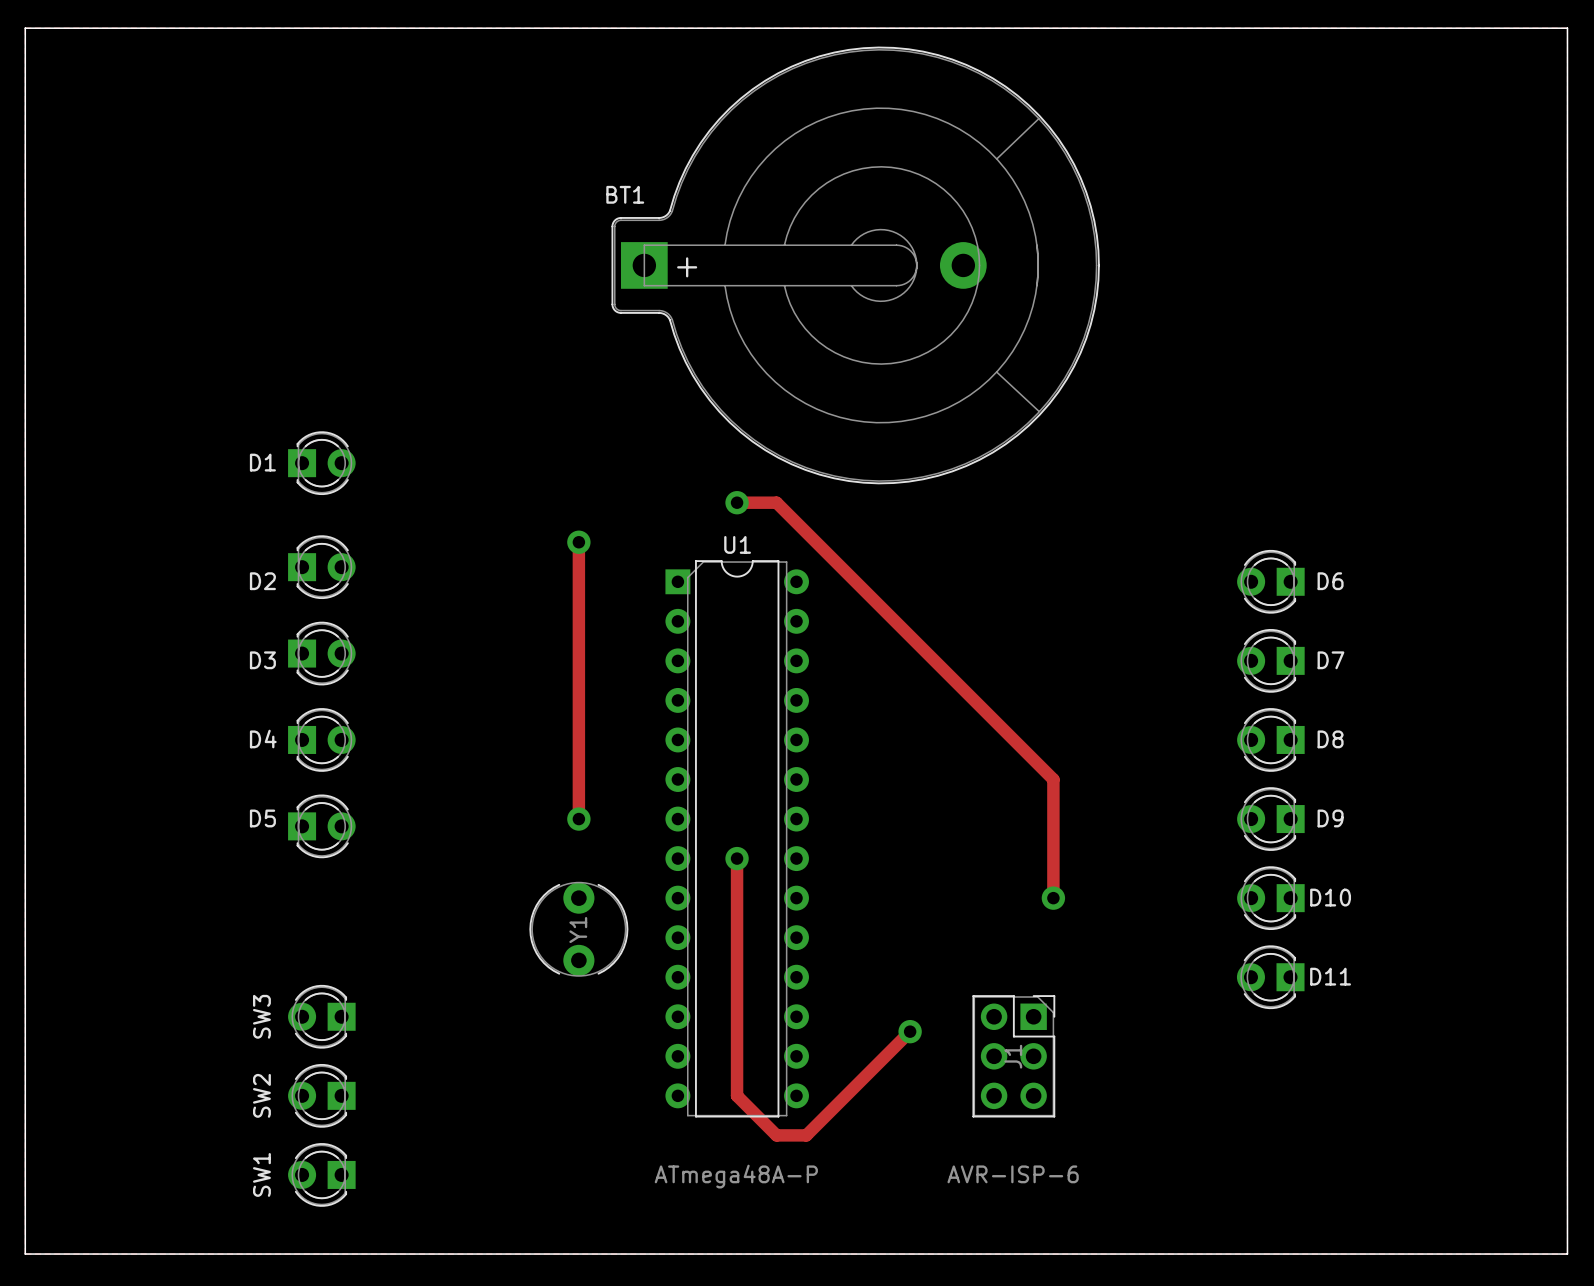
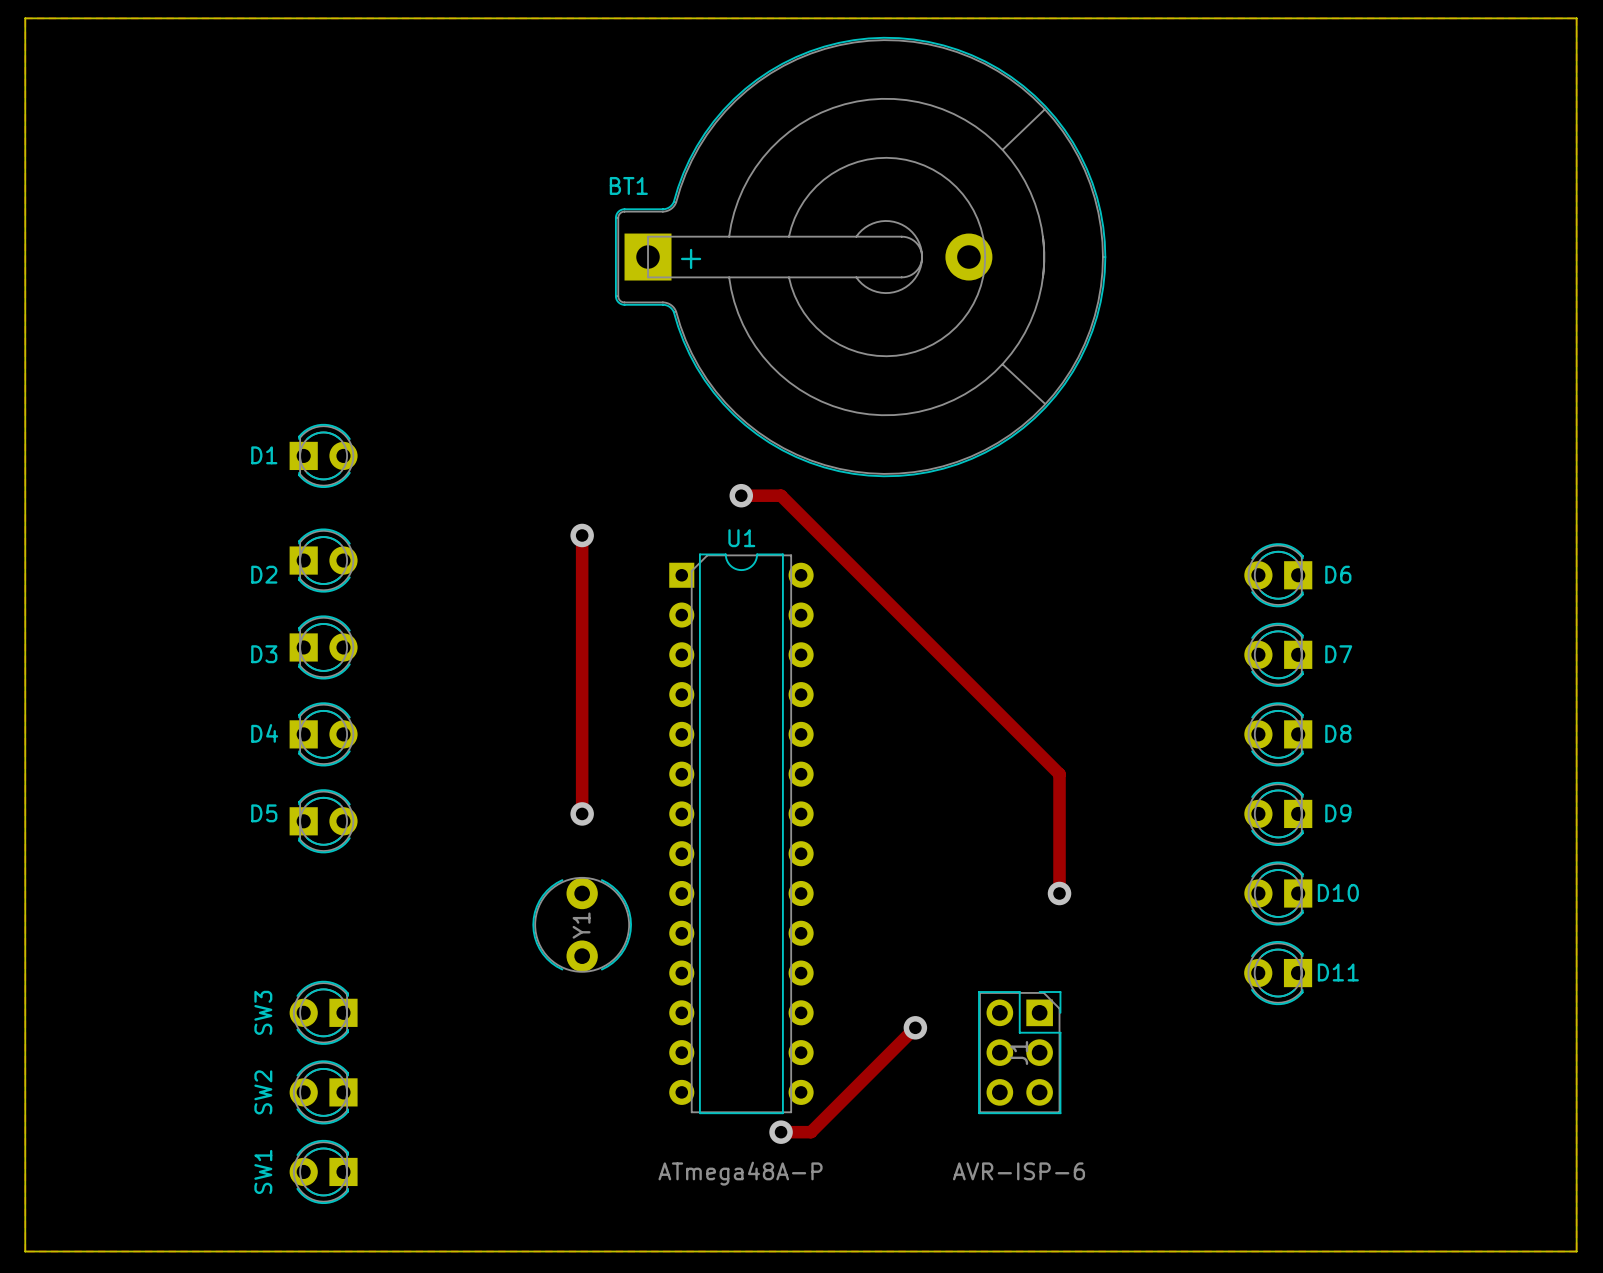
track: (737, 858) (737, 1095) (776, 1135) -> none
via: (737, 858) -> none
via: none -> (781, 1132)

